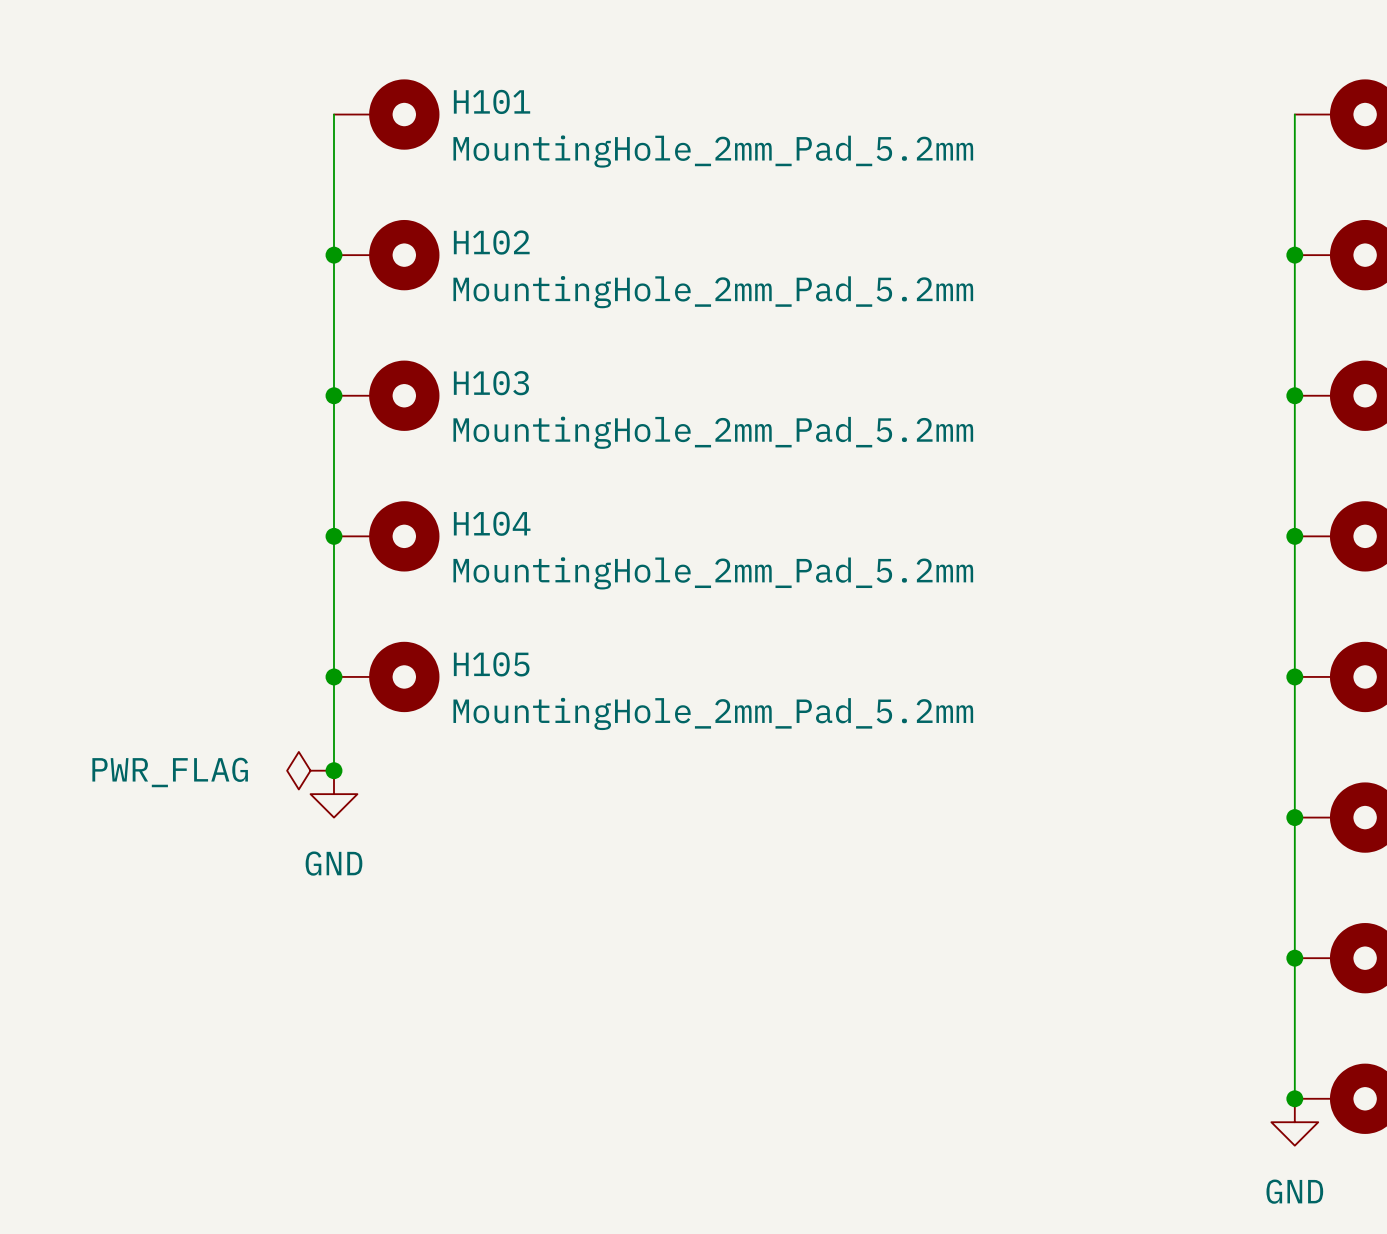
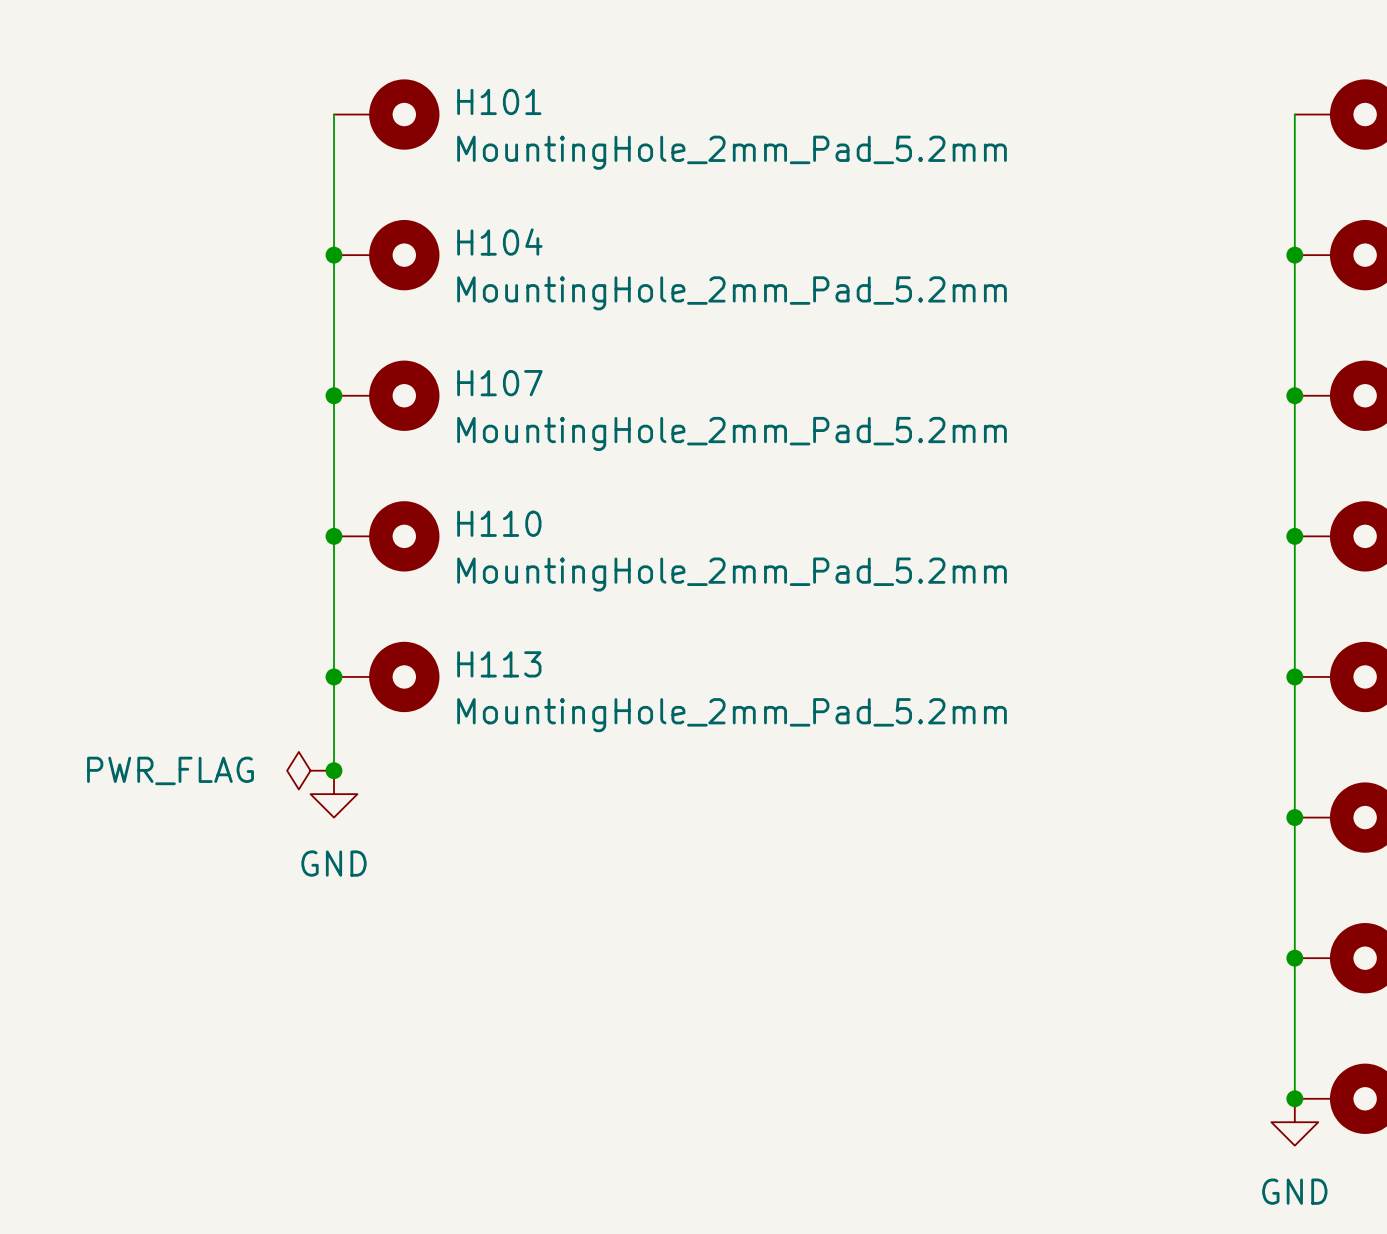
H102 name: H102 (491, 242) -> H104 (499, 241)
H103 name: H103 (491, 383) -> H107 (499, 383)
H104 name: H104 (492, 523) -> H110 (499, 523)
H105 name: H105 (491, 664) -> H113 (499, 664)

